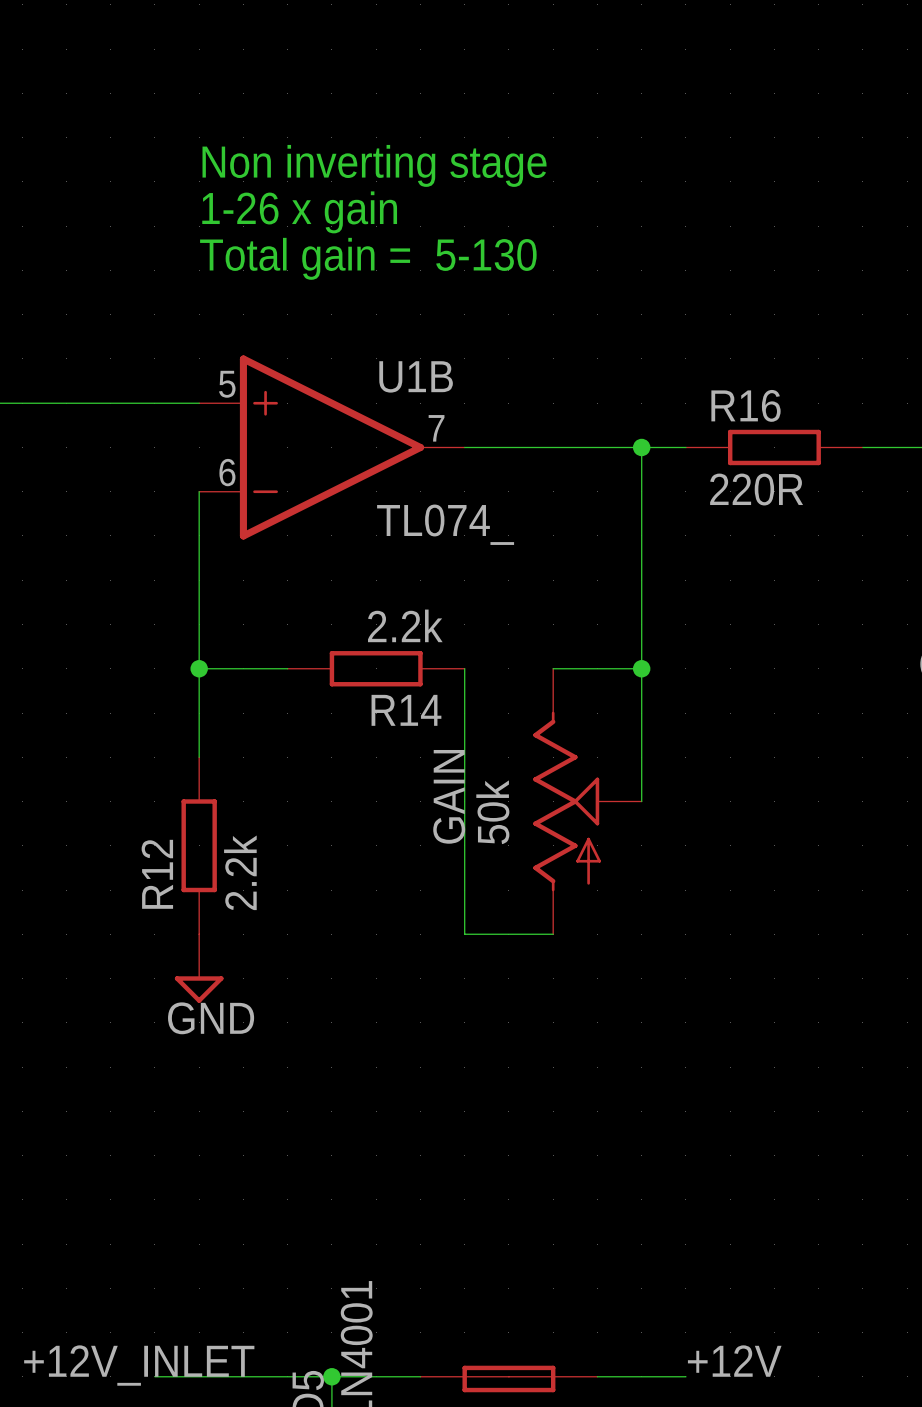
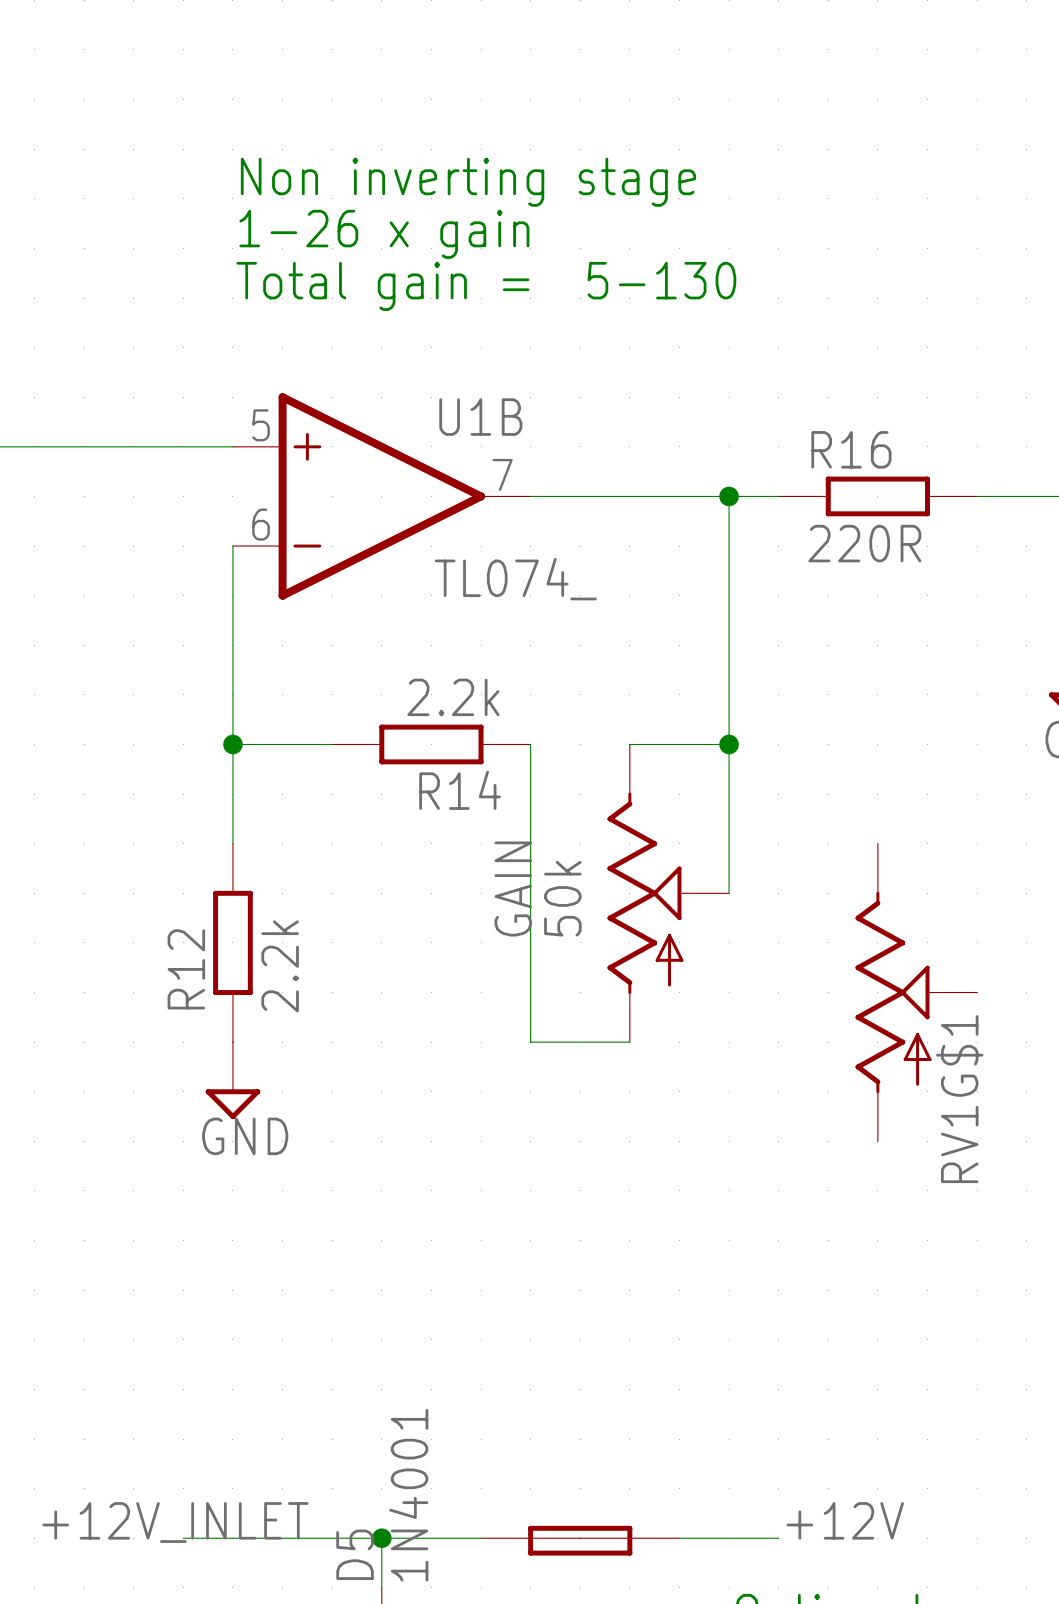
RV1G$1: none -> (916, 992)

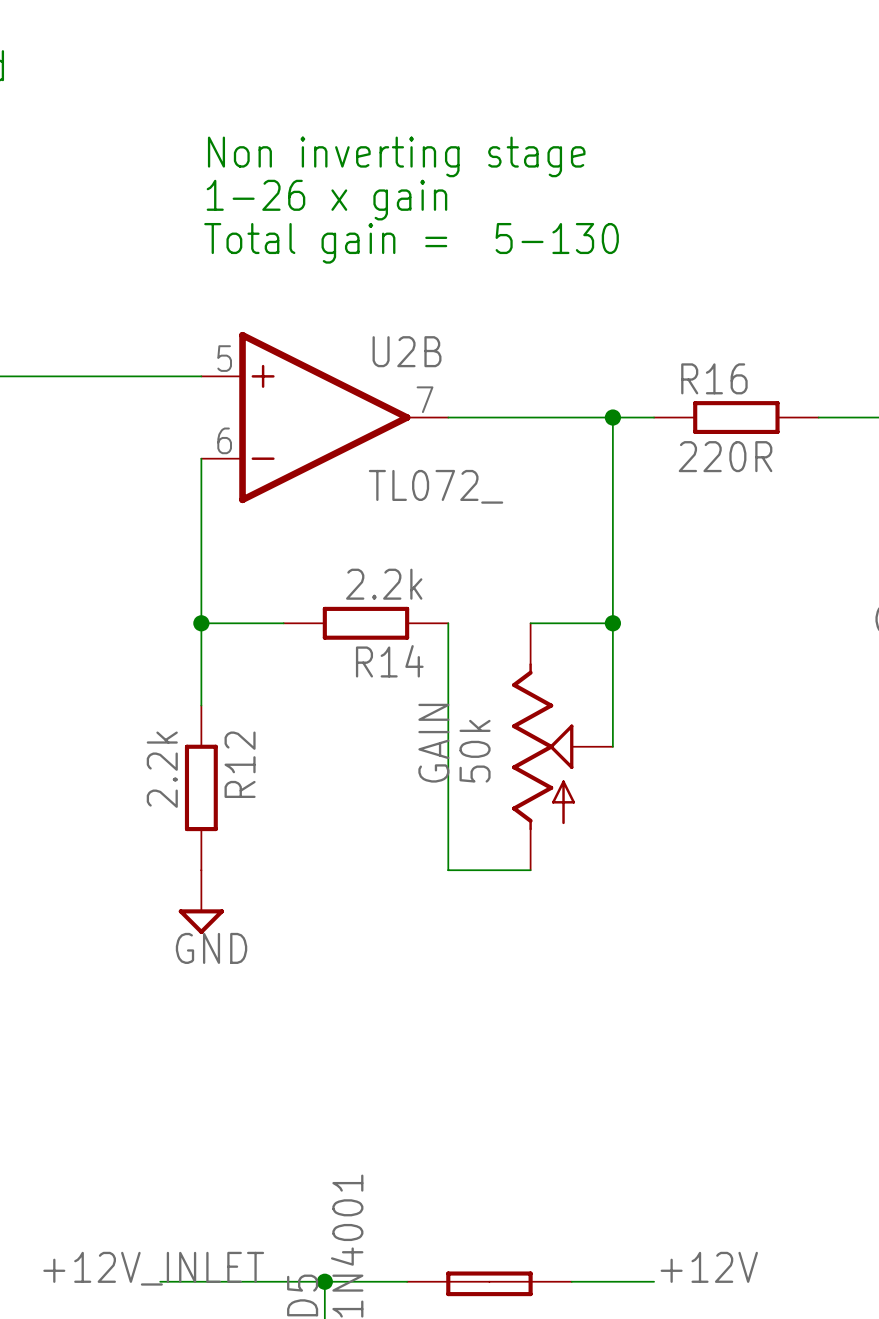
U1B name: U1B (480, 417) -> U2B (407, 351)
U1B value: TL074_ (515, 579) -> TL072_ (436, 486)
R12 value position: 2.2k (280, 966) -> 2.2k (162, 769)
R12 name position: R12 (186, 969) -> R12 (240, 764)
RV1G$1: (916, 992) -> none

